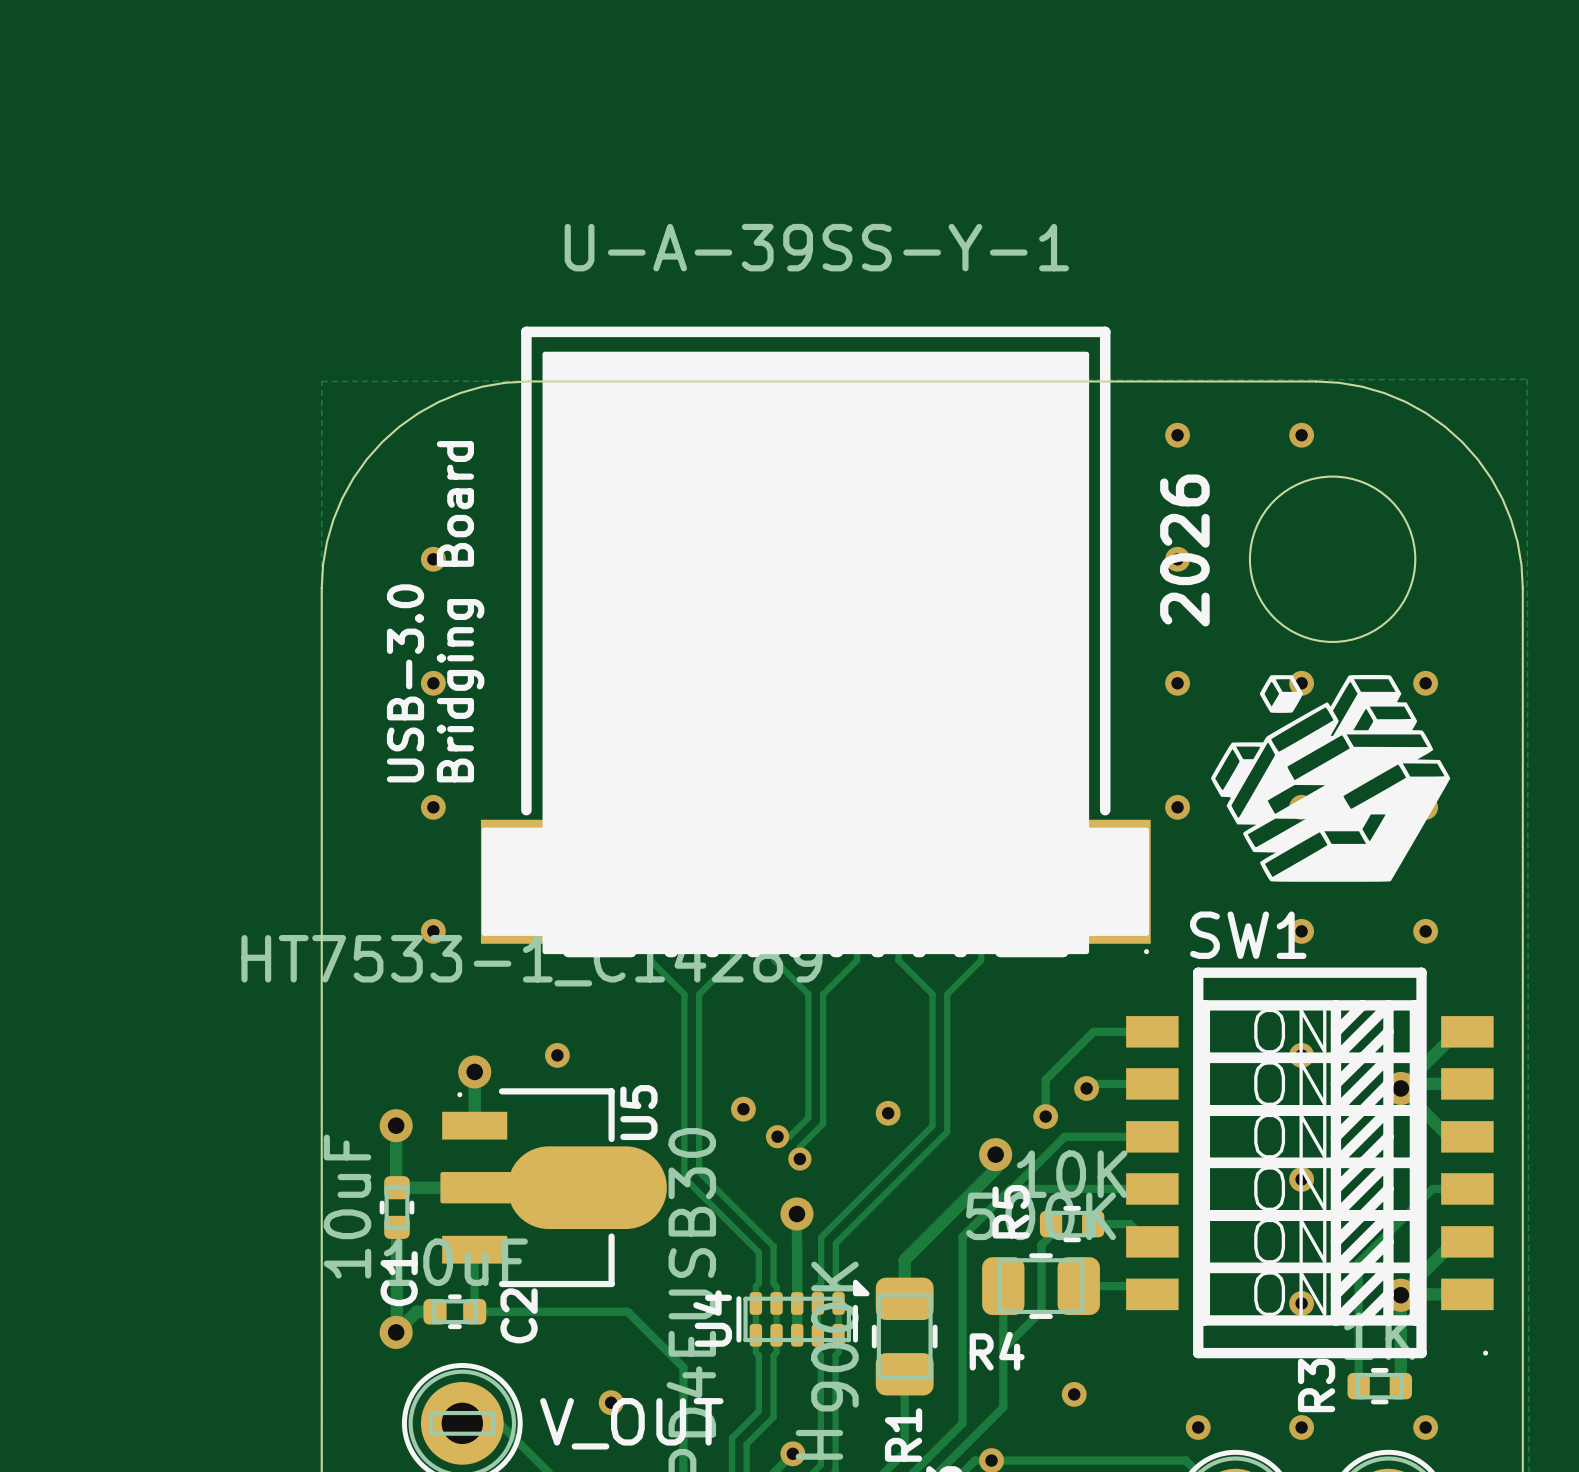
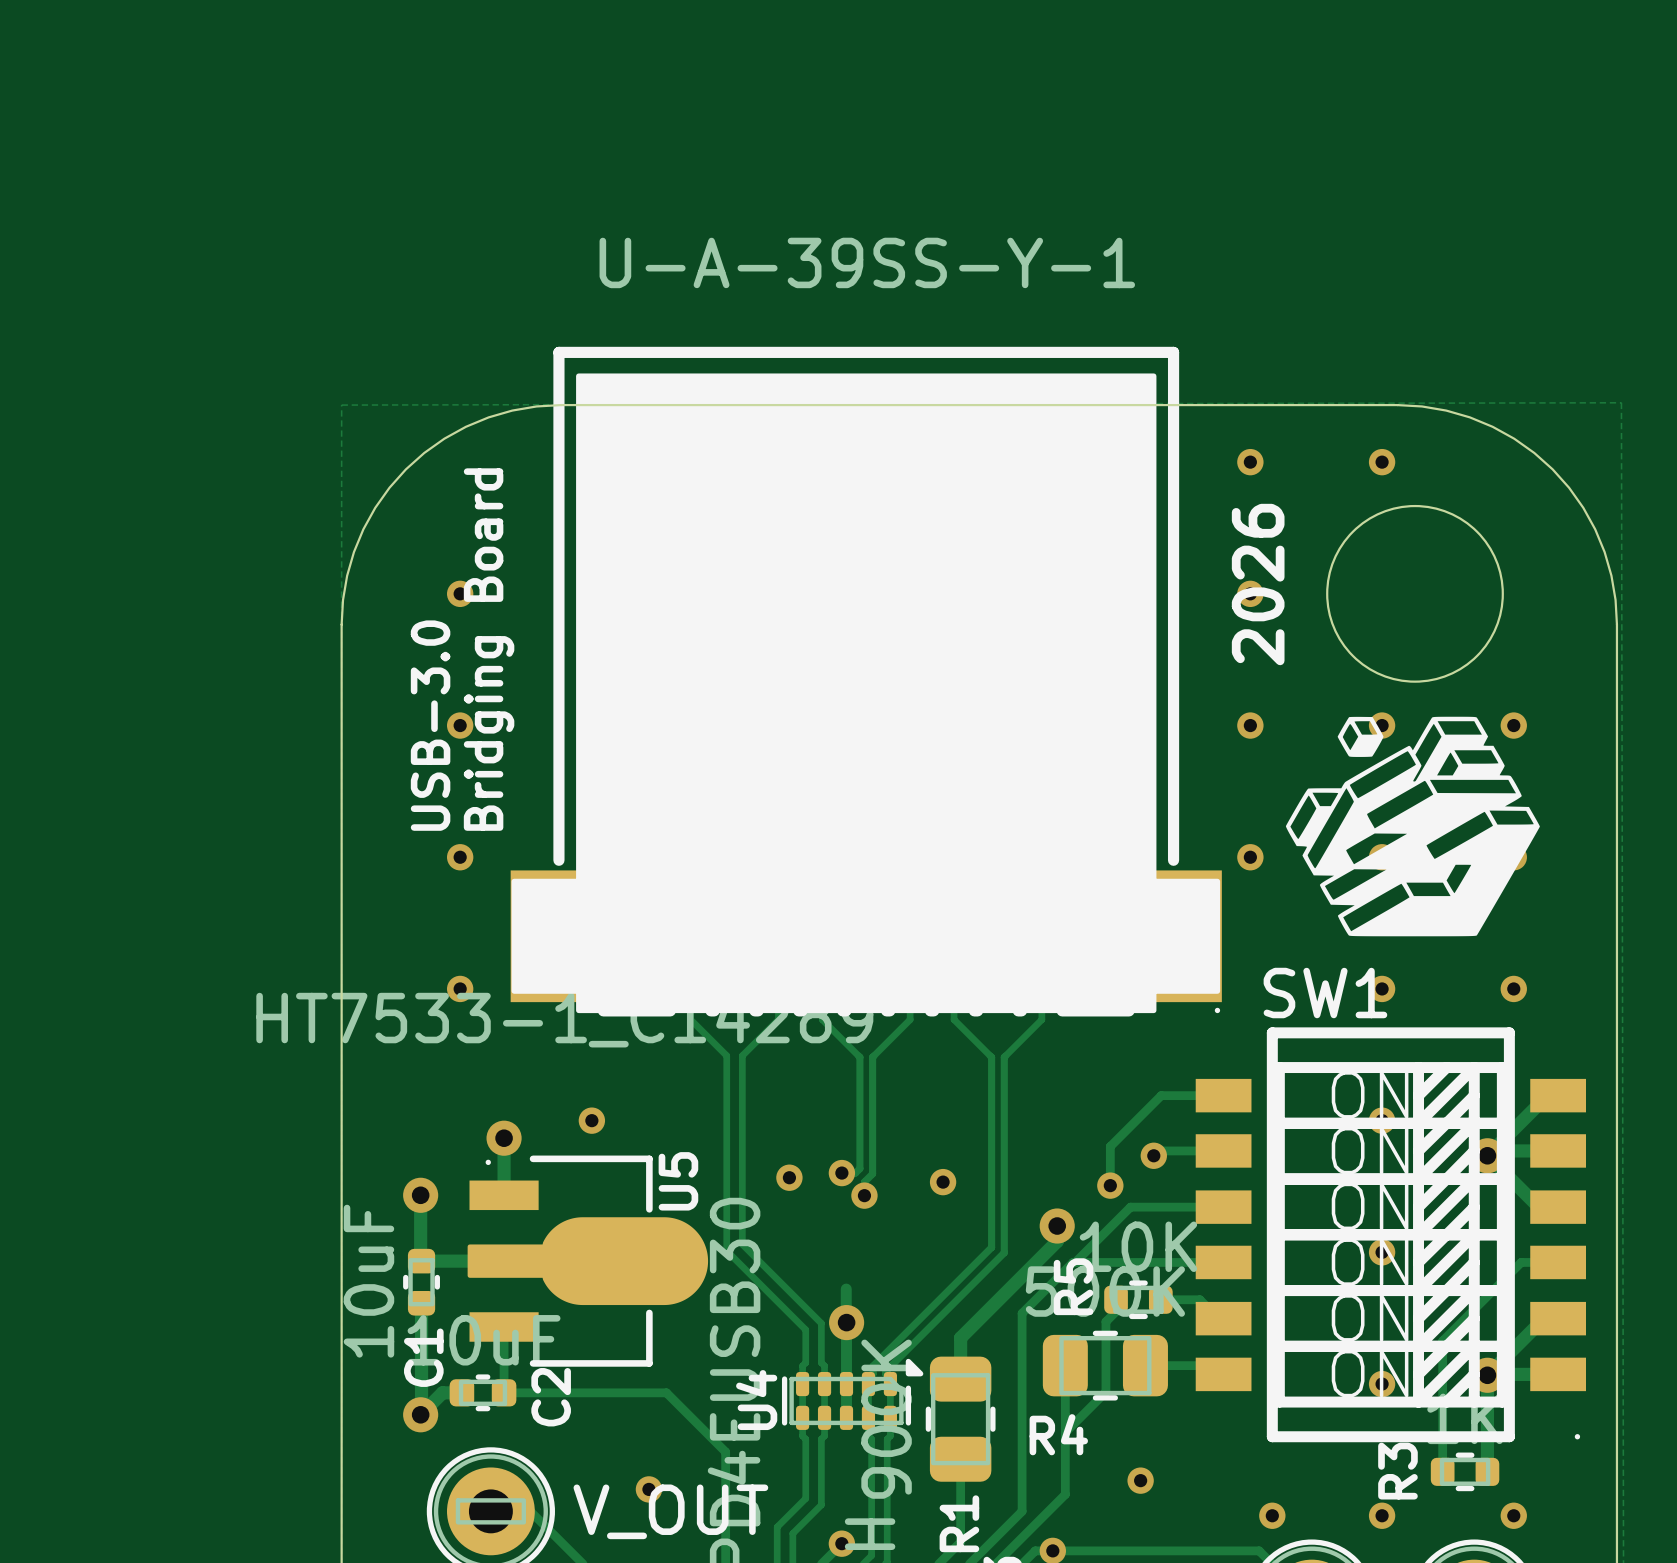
track: (808, 994) (808, 1117) (789, 1136) (777, 1136) -> (858, 1055) (859, 1168) (855, 1173) (841, 1173)
track: (823, 994) (823, 1123) (799, 1147) (799, 1159) -> (874, 1055) (872, 1173) (864, 1182) (864, 1195)
track: (932, 994) (932, 1125) (821, 1237) (821, 1283) (817, 1286) (817, 1298) -> (990, 1055) (991, 1247) (873, 1366) (873, 1373) (868, 1378)
track: (947, 994) (947, 1132) (835, 1243) (835, 1283) (838, 1286) (838, 1298) -> (1005, 1055) (1004, 1252) (885, 1371) (890, 1378)
via: none -> (841, 1173)
via: none -> (864, 1195)
via: (777, 1136) -> none
via: (799, 1159) -> none
via position: (796, 1214) -> (846, 1322)

